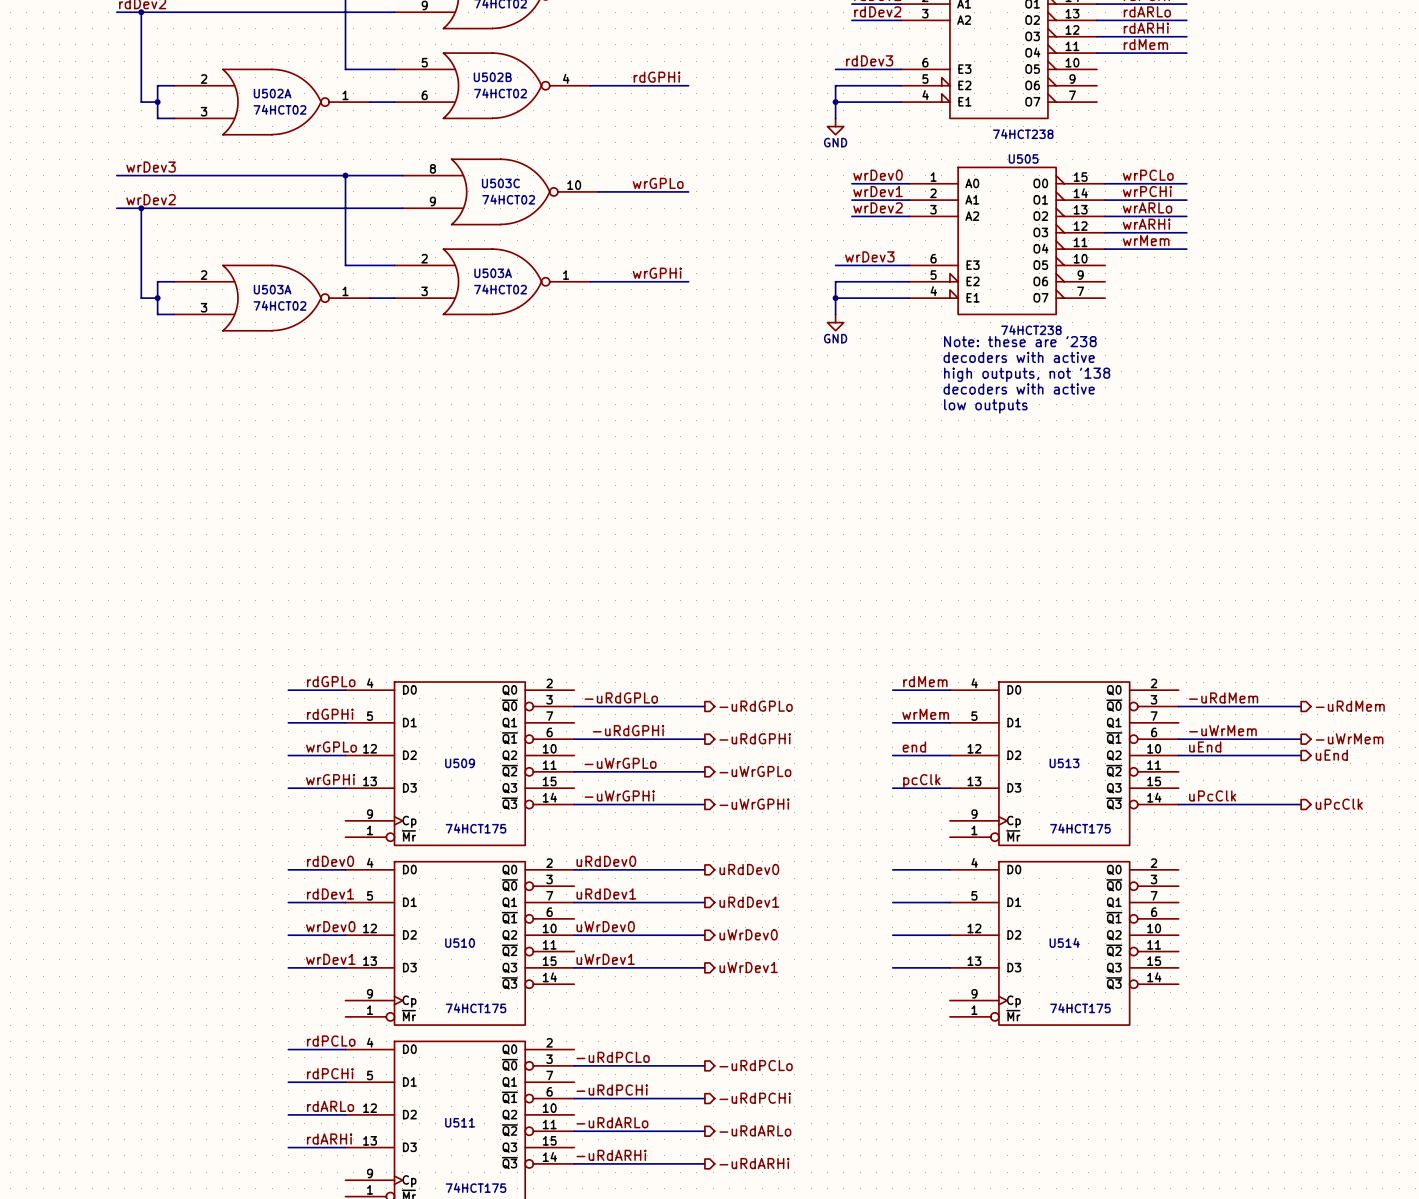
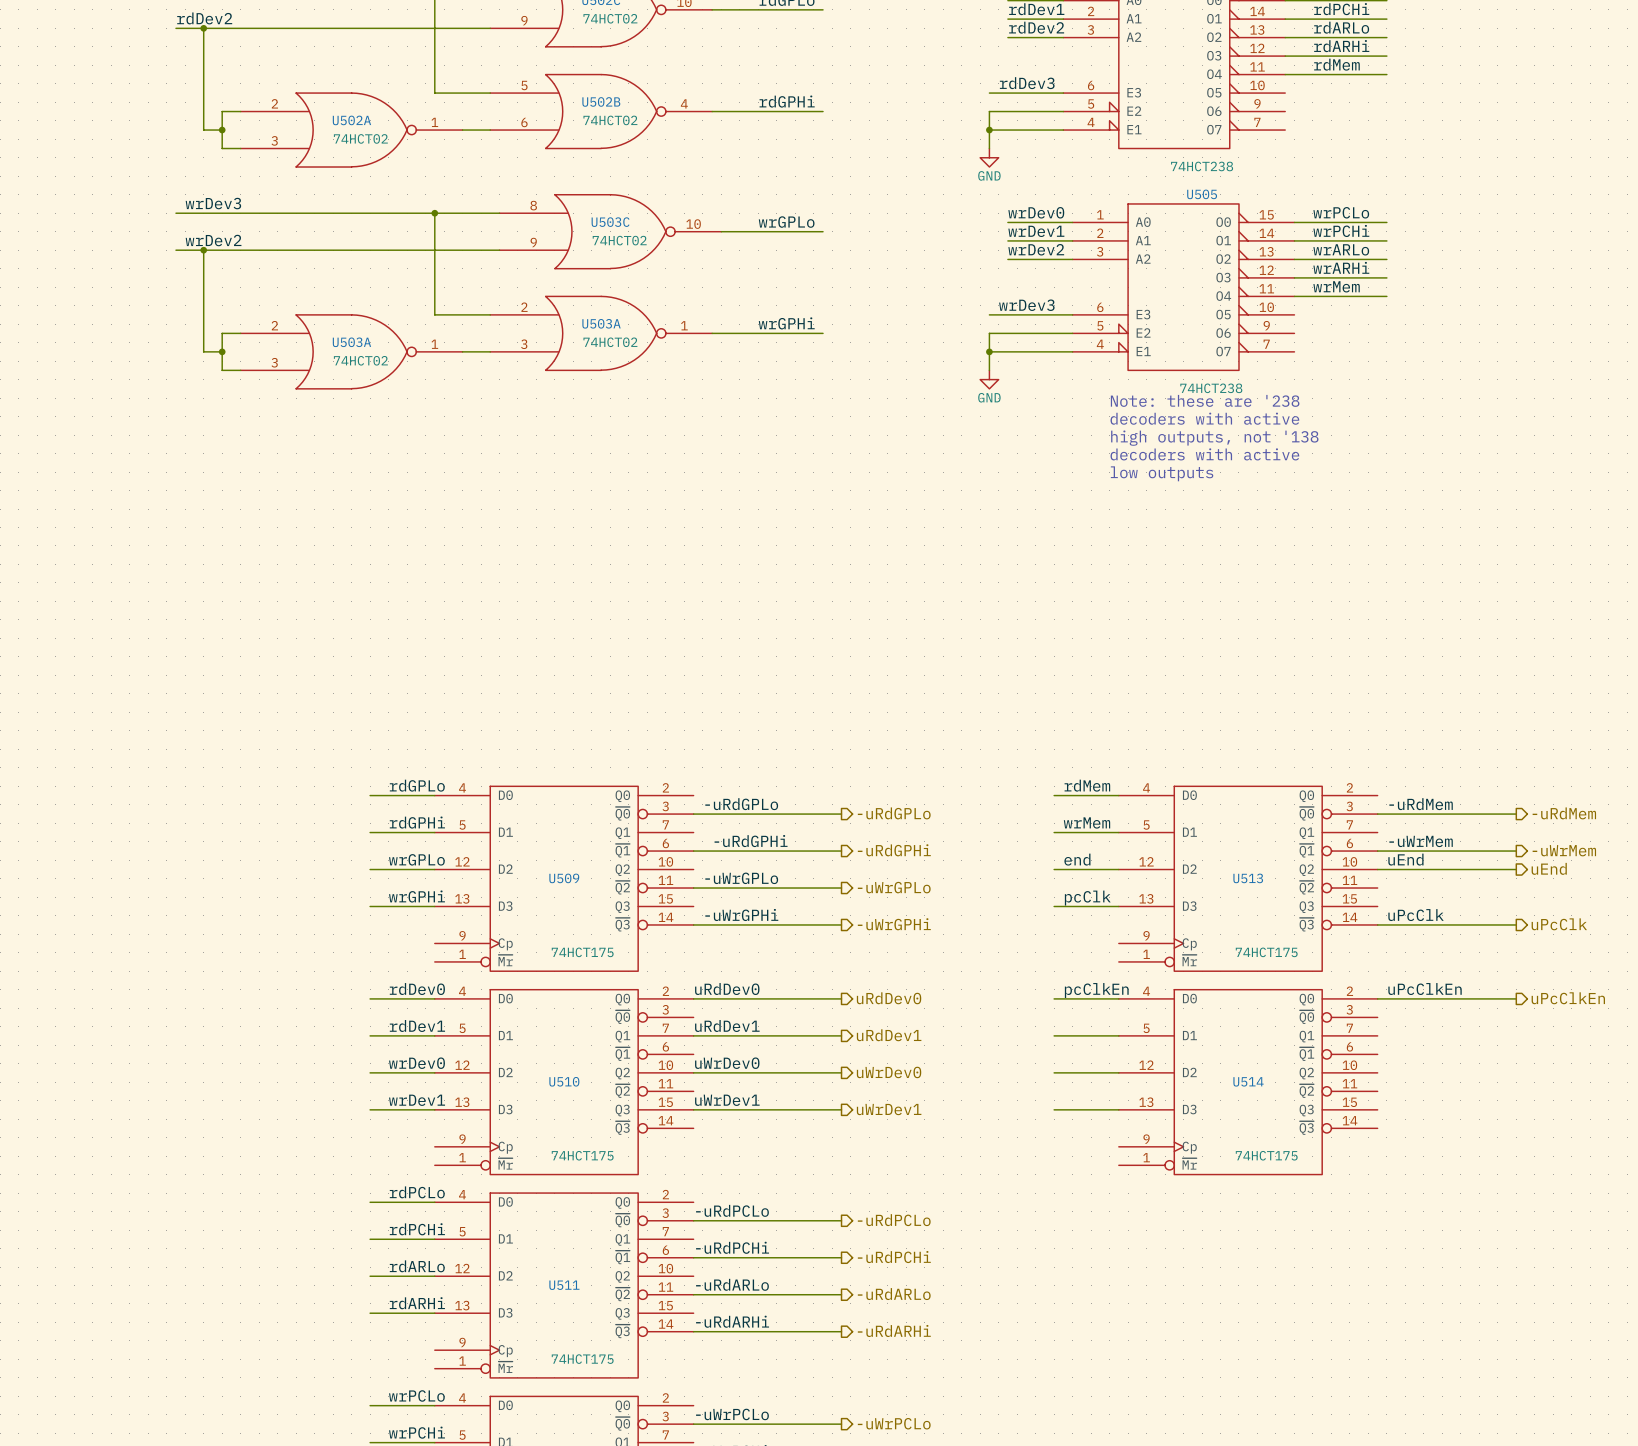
label: none -> uPcClkEn (1425, 989)
label: none -> pcClkEn (1096, 990)
wire: none -> (1377, 998) (1516, 998)
hierarchical label: none -> uPcClkEn (1568, 998)

